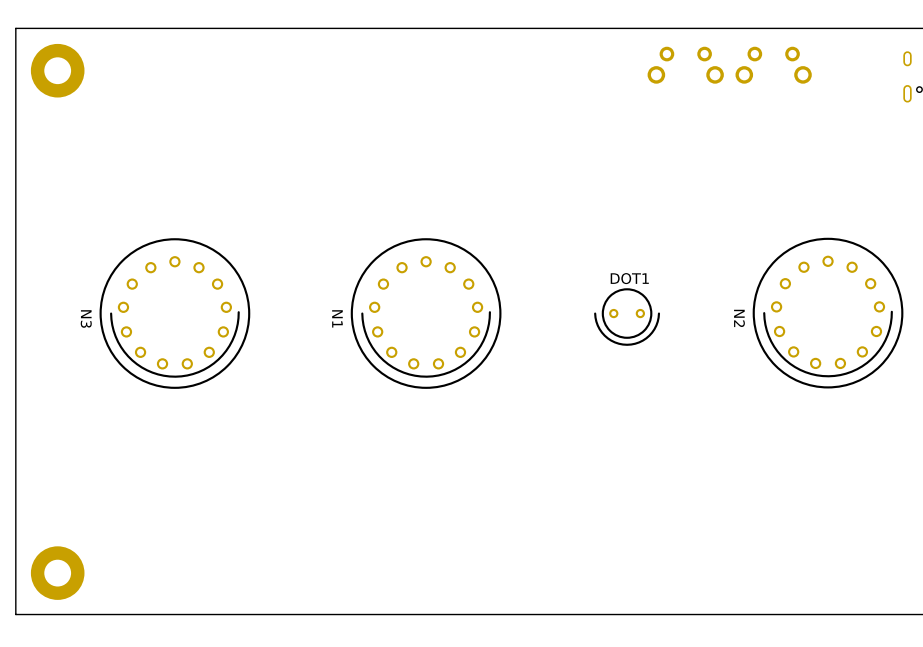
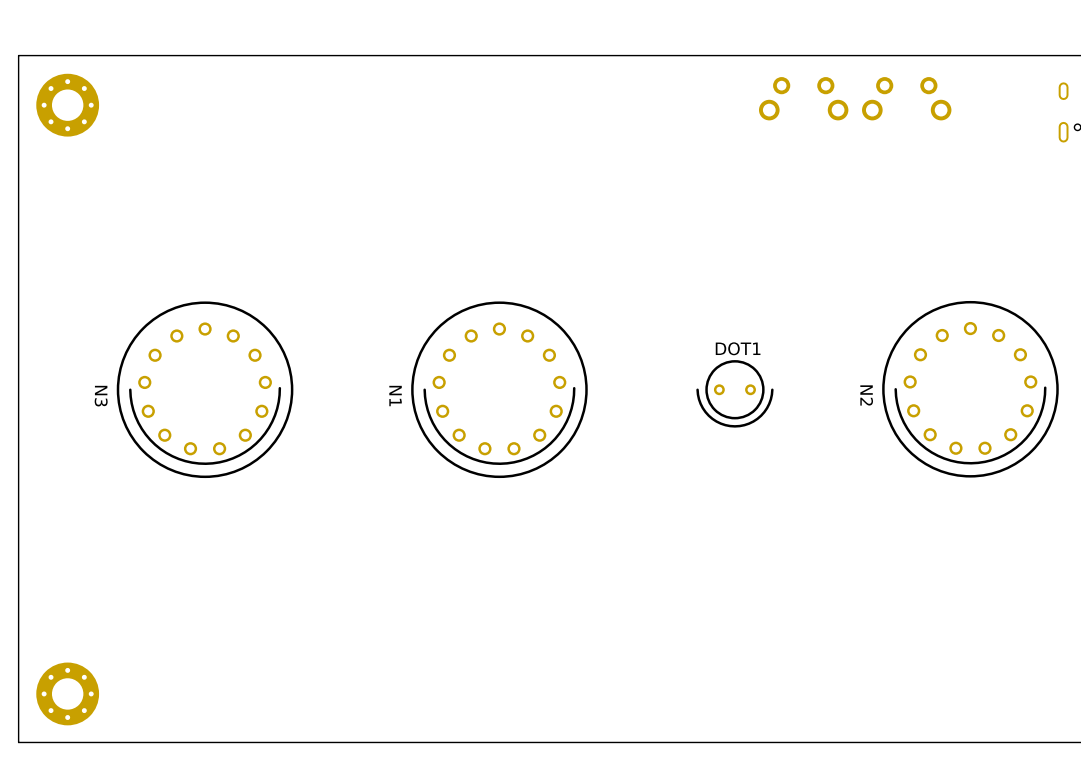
part footprint: [30, 43, 85, 98] -> [36, 73, 100, 137]
part footprint: [30, 546, 85, 600] -> [36, 662, 100, 726]

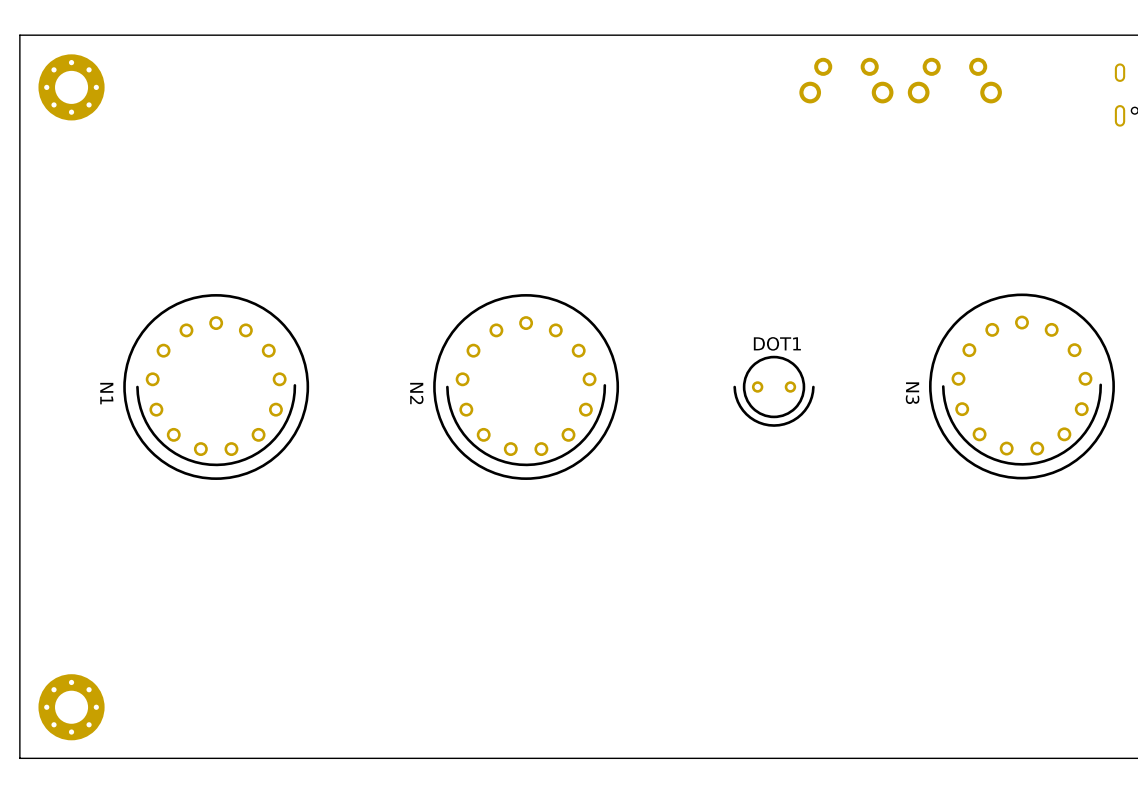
N2 name: N2 (866, 395) -> N3 (912, 393)
N3 name: N3 (101, 396) -> N1 (106, 393)
N1 name: N1 (395, 396) -> N2 (416, 393)

